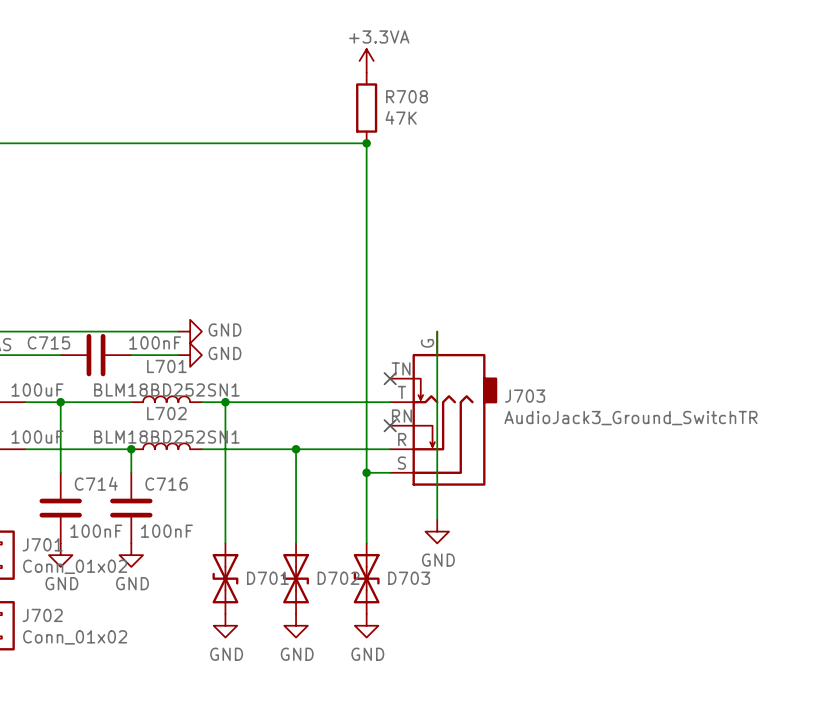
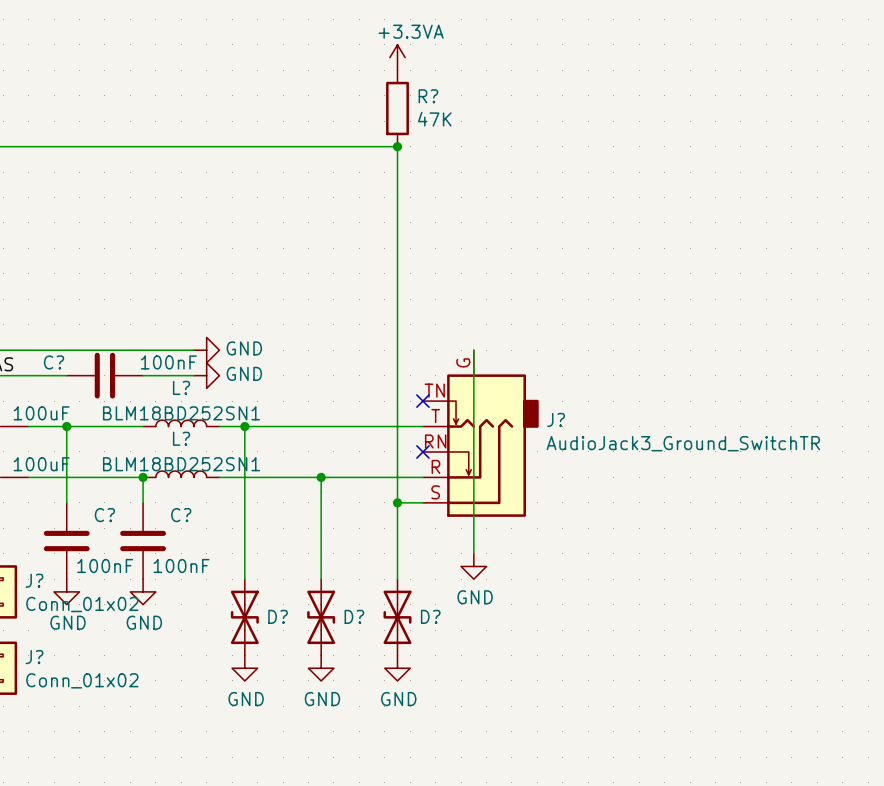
R708 name: R708 (407, 96) -> R? (428, 96)
C715 name: C715 (48, 342) -> C? (54, 362)
L701 name: L701 (166, 366) -> L? (181, 387)
J703 name: J703 (525, 396) -> J? (556, 419)
L702 name: L702 (166, 413) -> L? (181, 438)
C714 name: C714 (96, 483) -> C? (104, 515)
C716 name: C716 (166, 484) -> C? (181, 515)
J701 name: J701 (42, 544) -> J? (34, 580)
D701 name: D701 (267, 578) -> D? (278, 616)
D702 name: D702 (338, 578) -> D? (354, 616)
D703 name: D703 (409, 578) -> D? (430, 616)
J702 name: J702 (42, 615) -> J? (34, 657)

